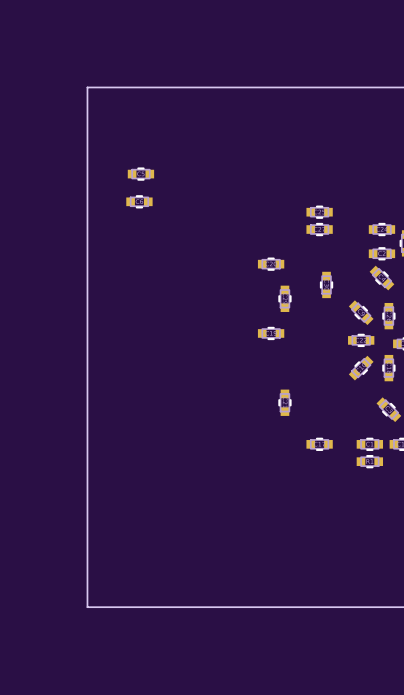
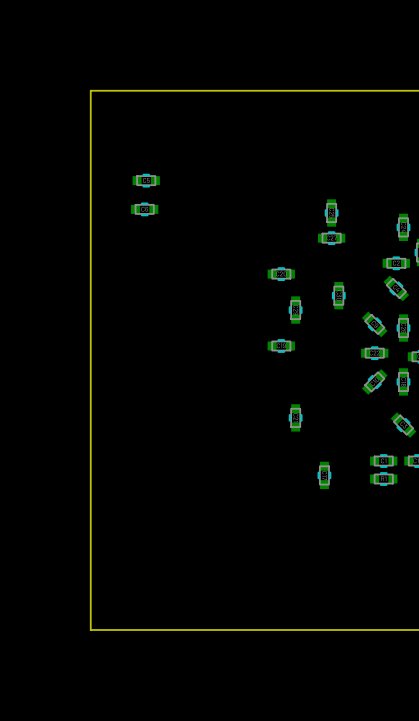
part rotation: 0° (319, 212) -> 90° clockwise (331, 212)
part rotation: 0° (381, 229) -> 90° clockwise (403, 227)
part rotation: 0° (319, 444) -> 90° clockwise (324, 475)

